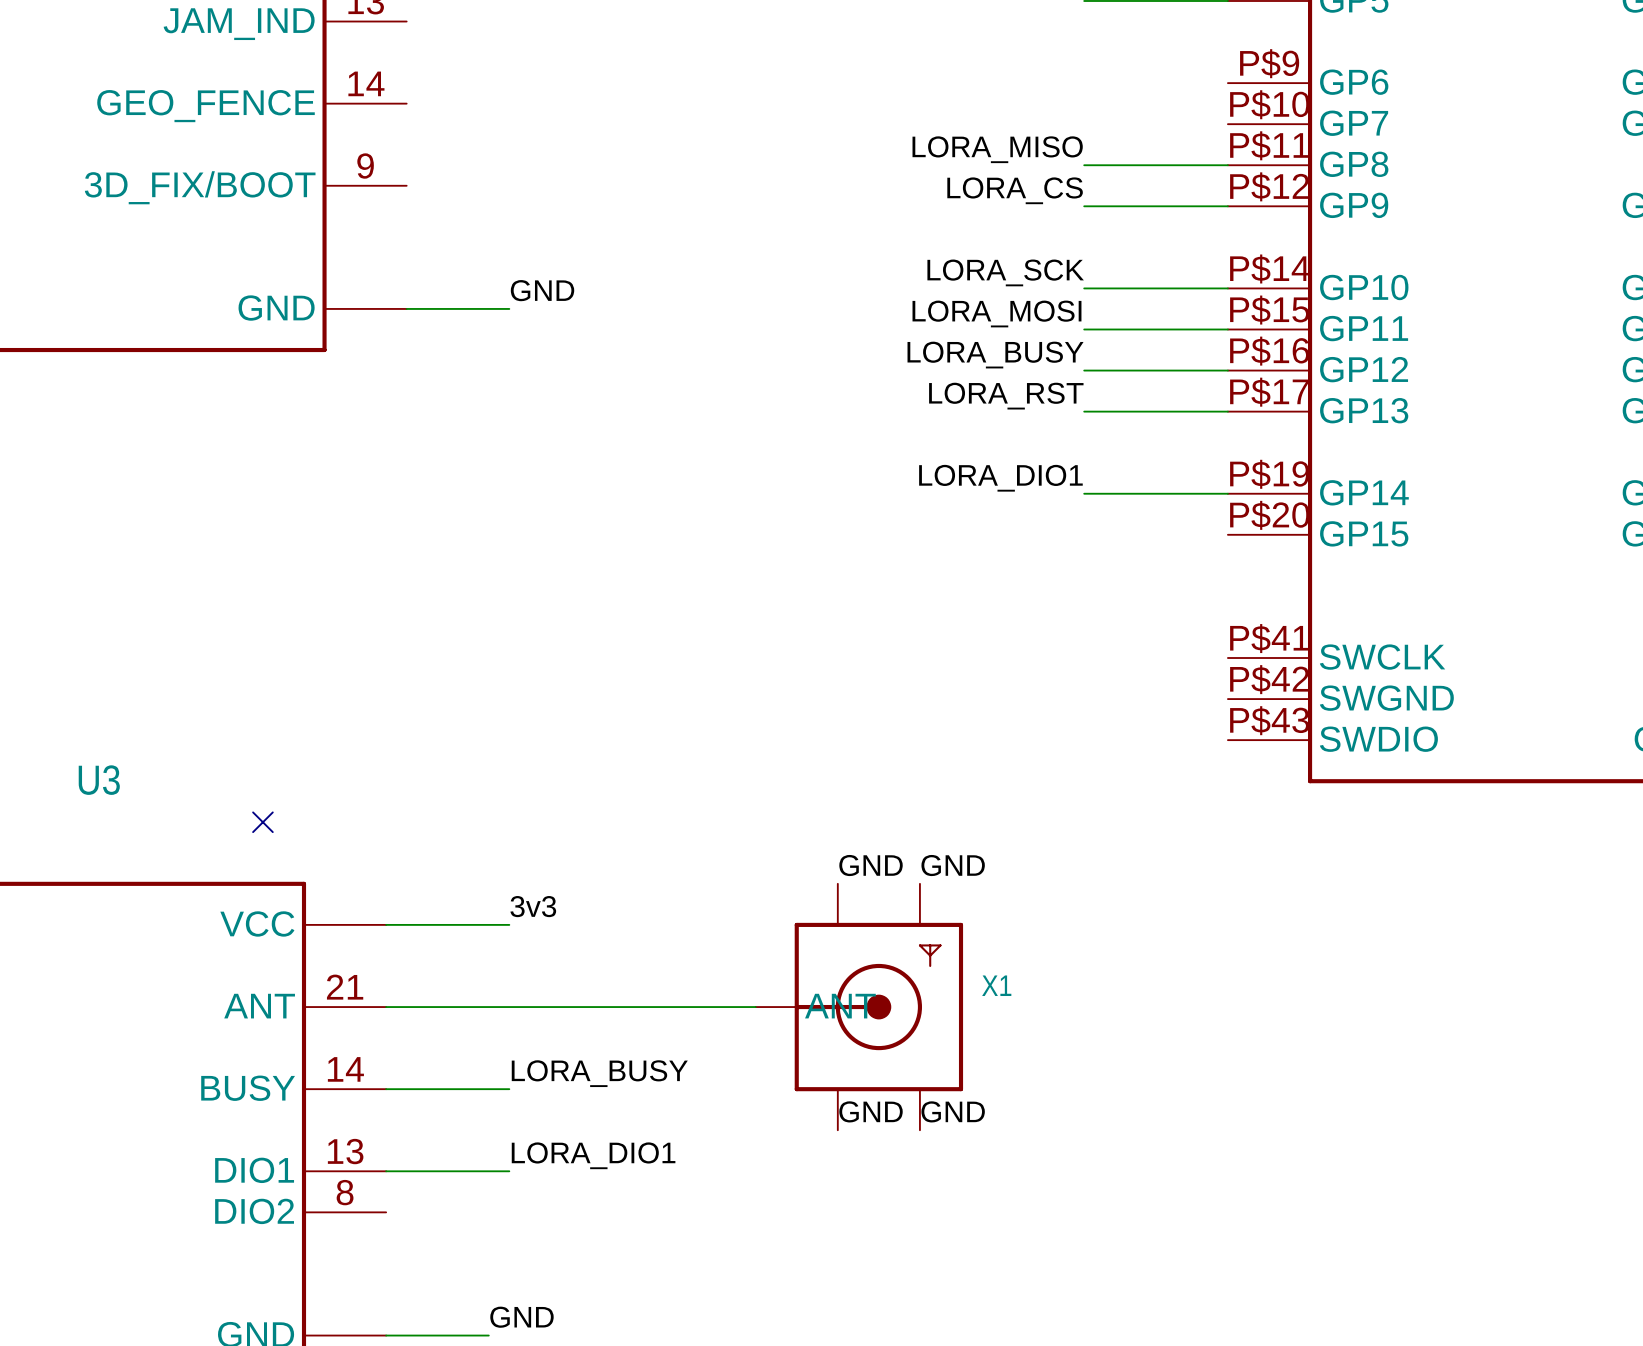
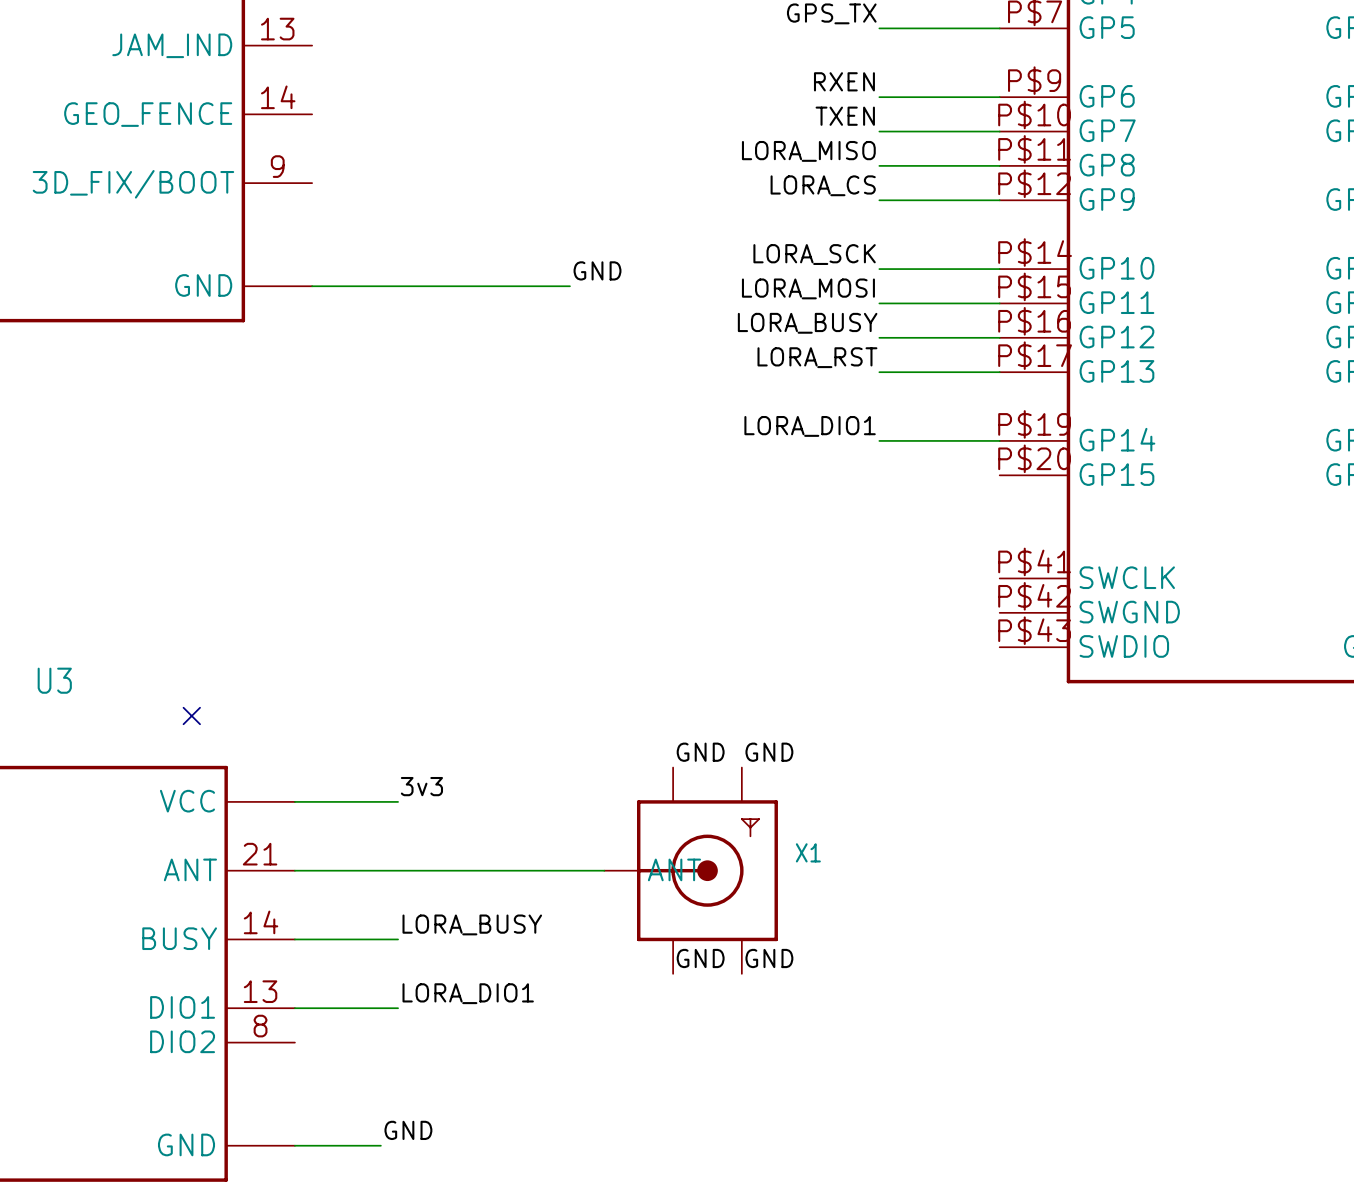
label: none -> RXEN (844, 81)
wire: none -> (879, 97) (999, 97)
label: none -> TXEN (845, 116)
wire: none -> (879, 131) (999, 131)
label position: GND (542, 290) -> GND (597, 270)
wire: none -> (398, 286) (569, 286)

